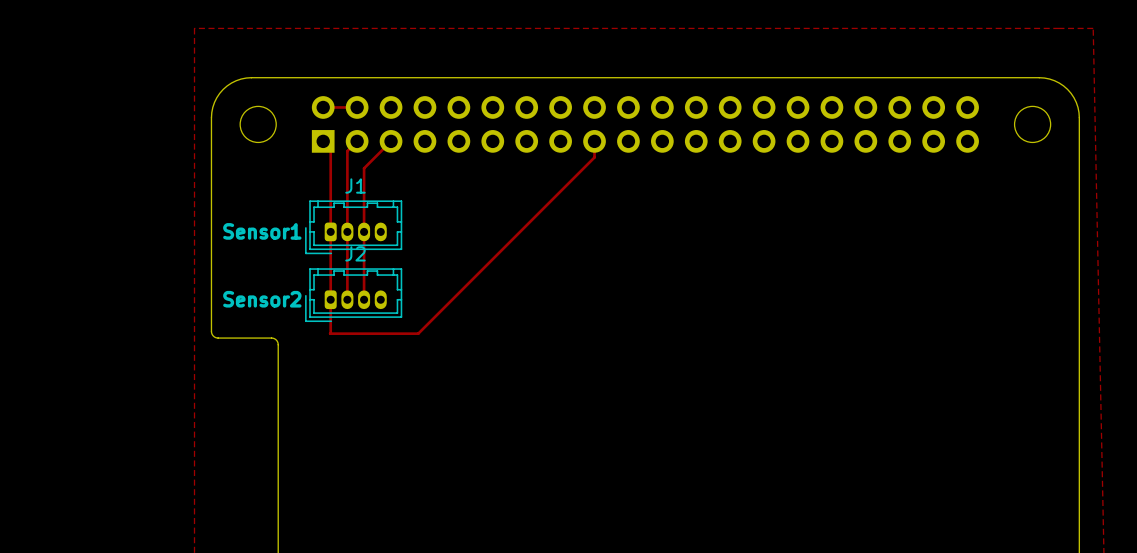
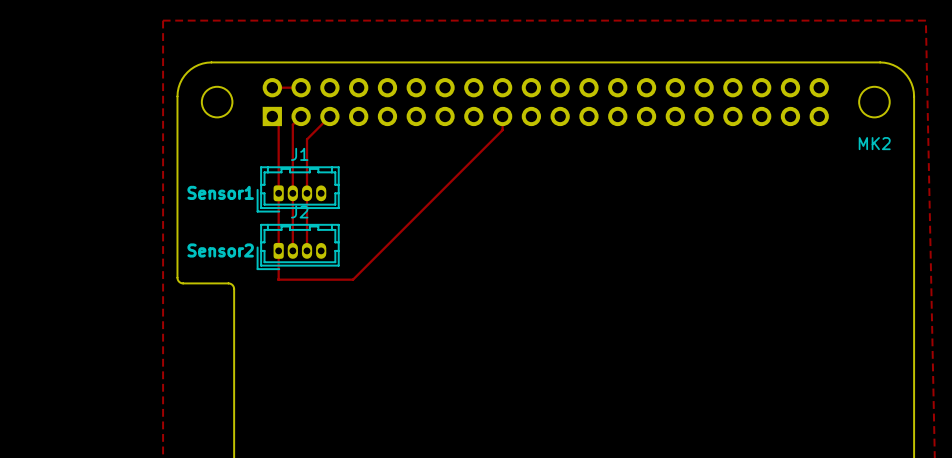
MK2 name: none -> MK2 (874, 143)

